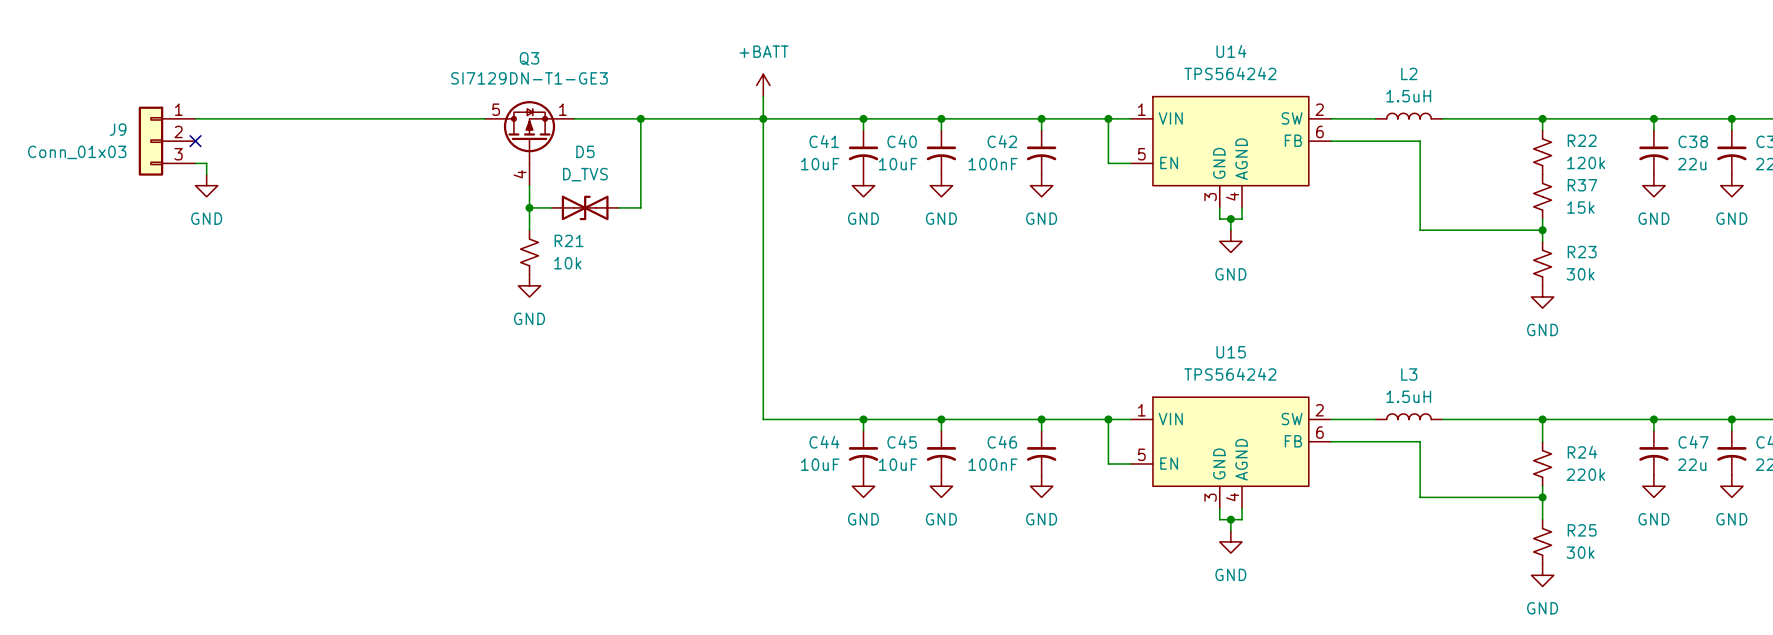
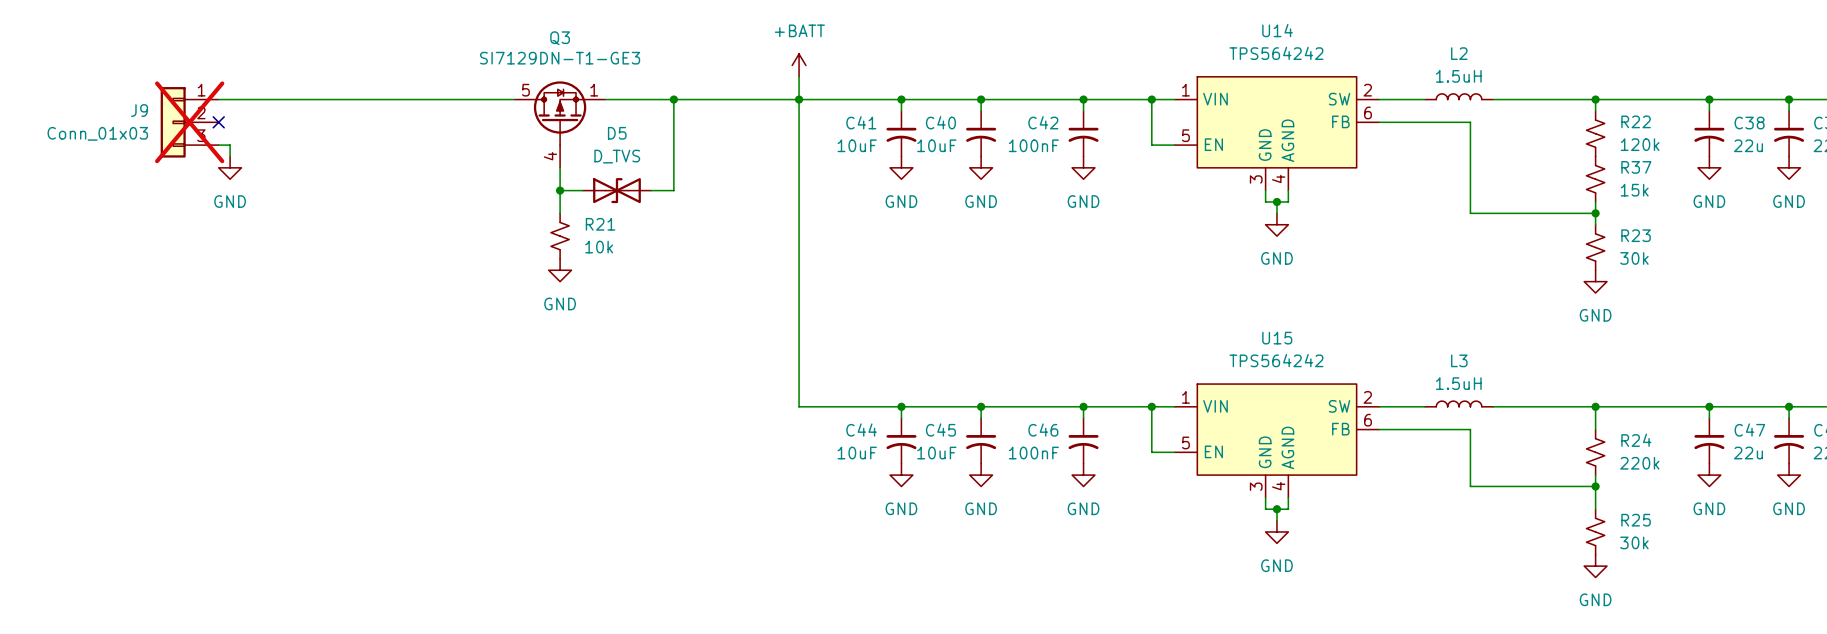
J9 do-not-place cross: none -> (189, 122)

